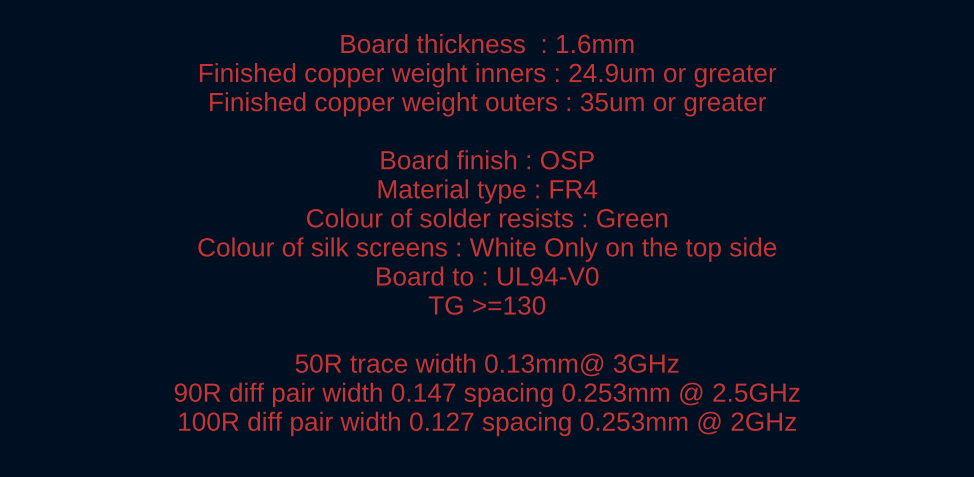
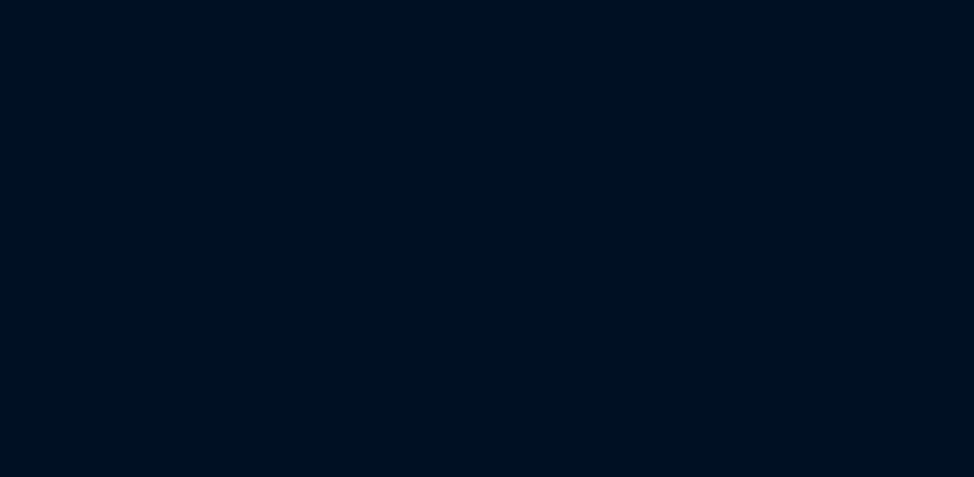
text: Board thickness : 1.6mm (487, 43) -> none
text: Finished copper weight inners : 24.9um or greater (488, 75) -> none
text: Finished copper weight outers : 35um or greater (488, 104) -> none
text: Board finish : OSP (487, 159) -> none
text: Material type : FR4 (487, 191) -> none
text: Colour of solder resists : Green (487, 217) -> none
text: Colour of silk screens : White Only on the top side (487, 249) -> none
text: Board to : UL94-V0 (487, 276) -> none
text: TG >=130 (486, 305) -> none
text: 50R trace width 0.13mm@ 3GHz (487, 364) -> none
text: 90R diff pair width 0.147 spacing 0.253mm @ 2.5GHz (487, 394) -> none
text: 100R diff pair width 0.127 spacing 0.253mm @ 2GHz (487, 423) -> none

